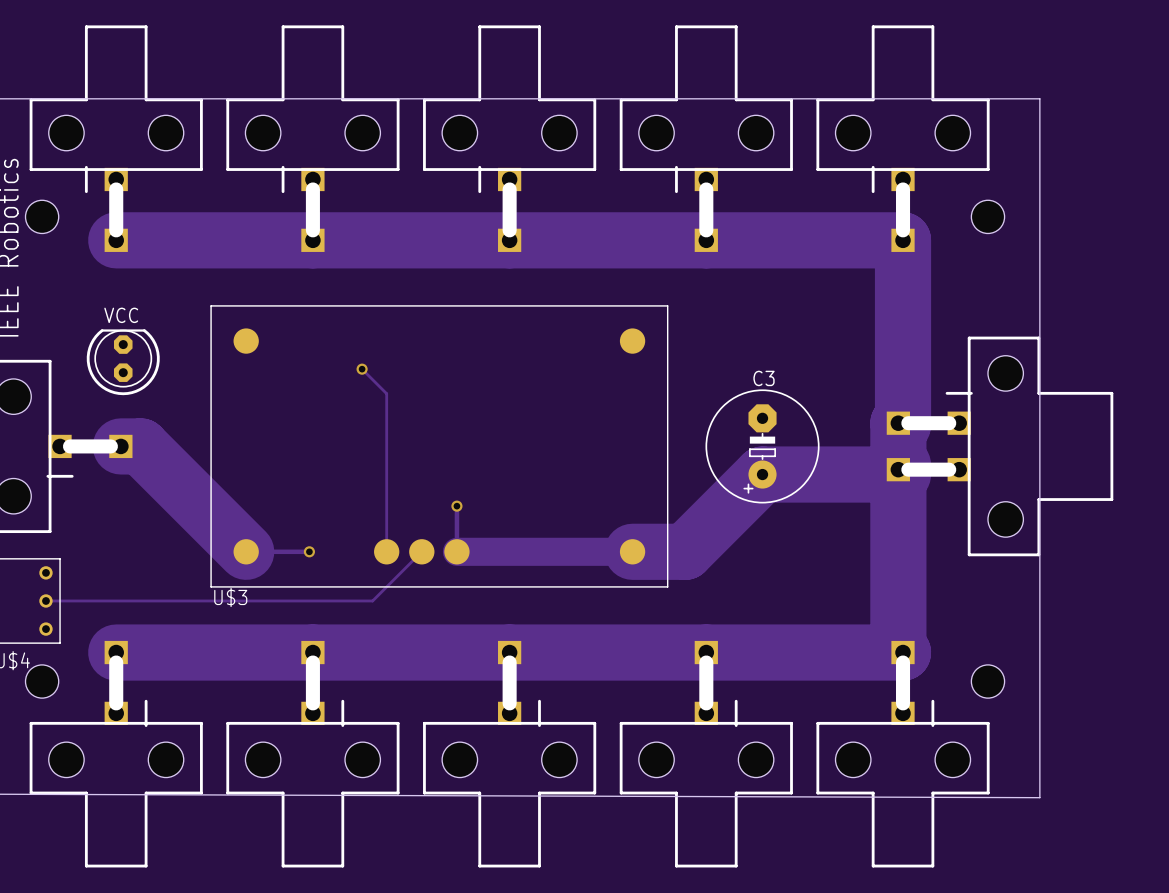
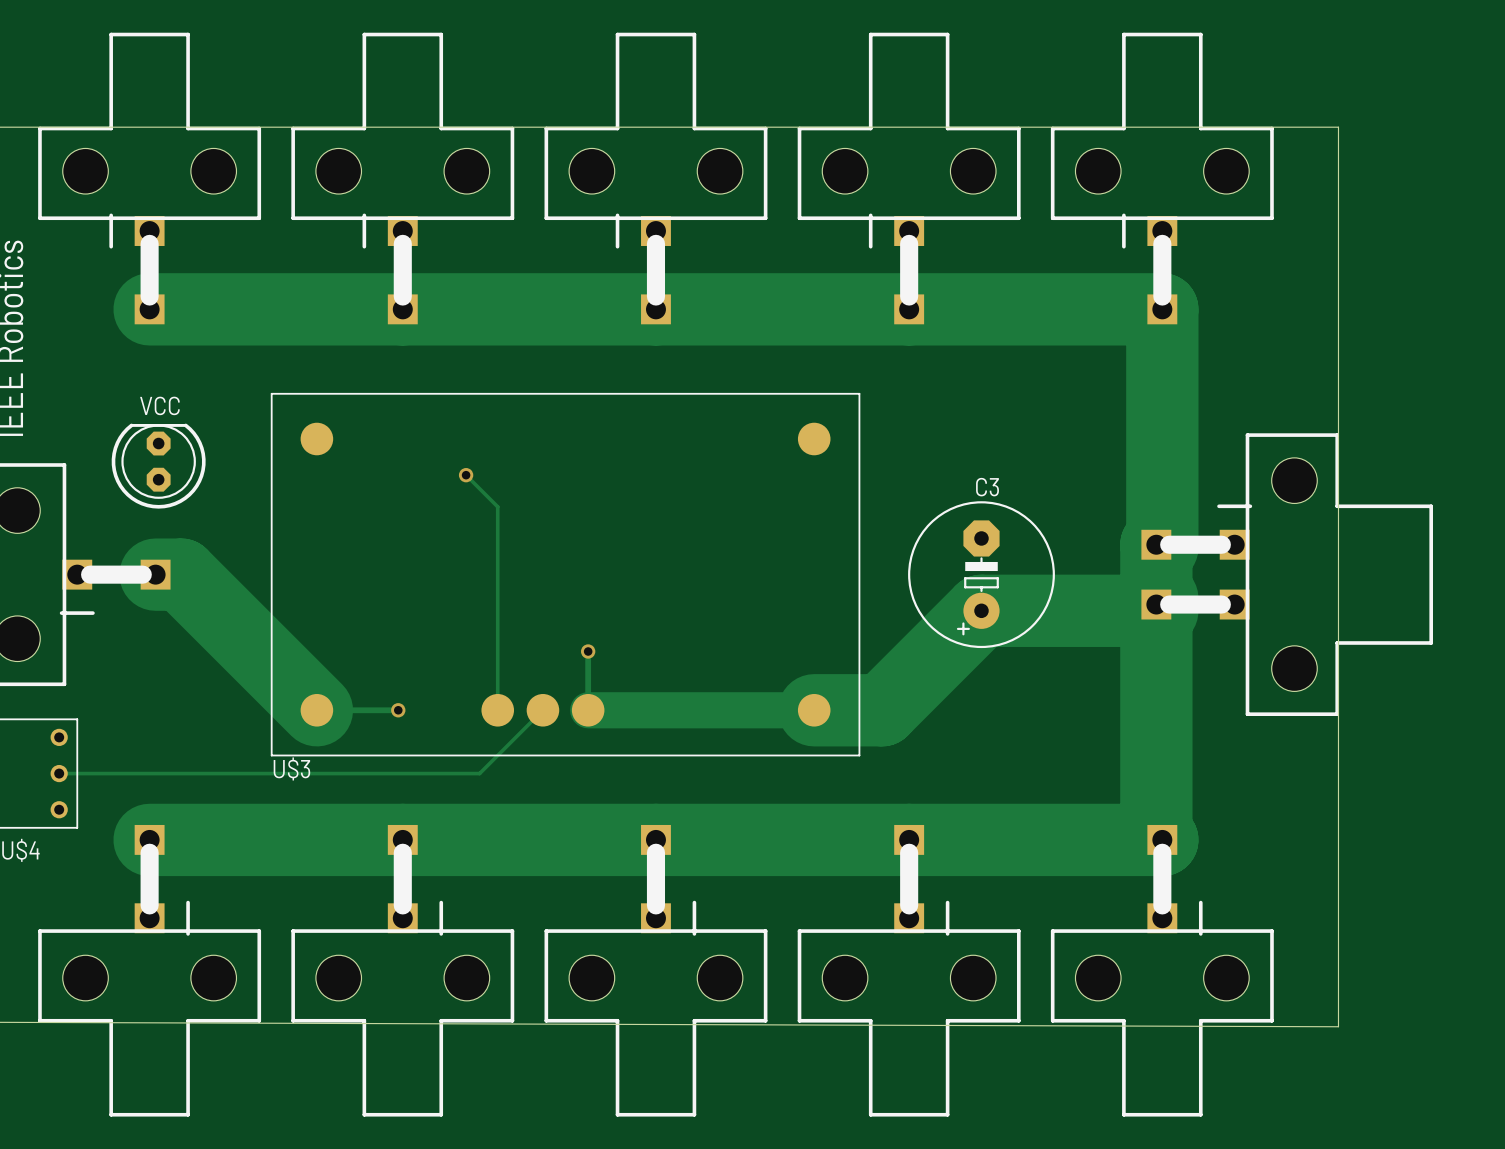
hole: (42, 216) -> none
hole: (987, 216) -> none
hole: (42, 681) -> none
hole: (987, 681) -> none

